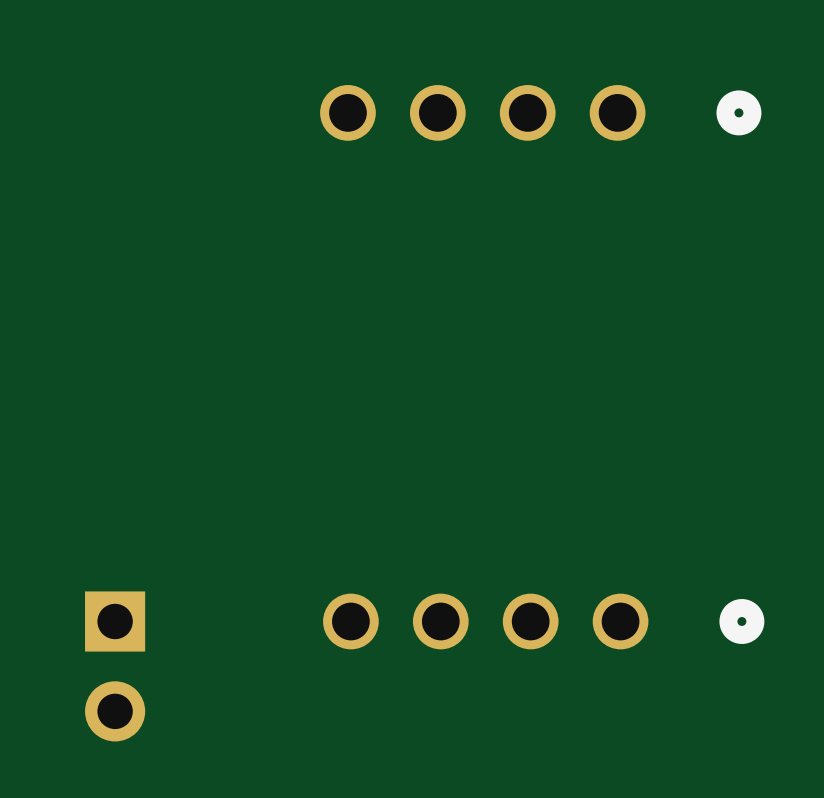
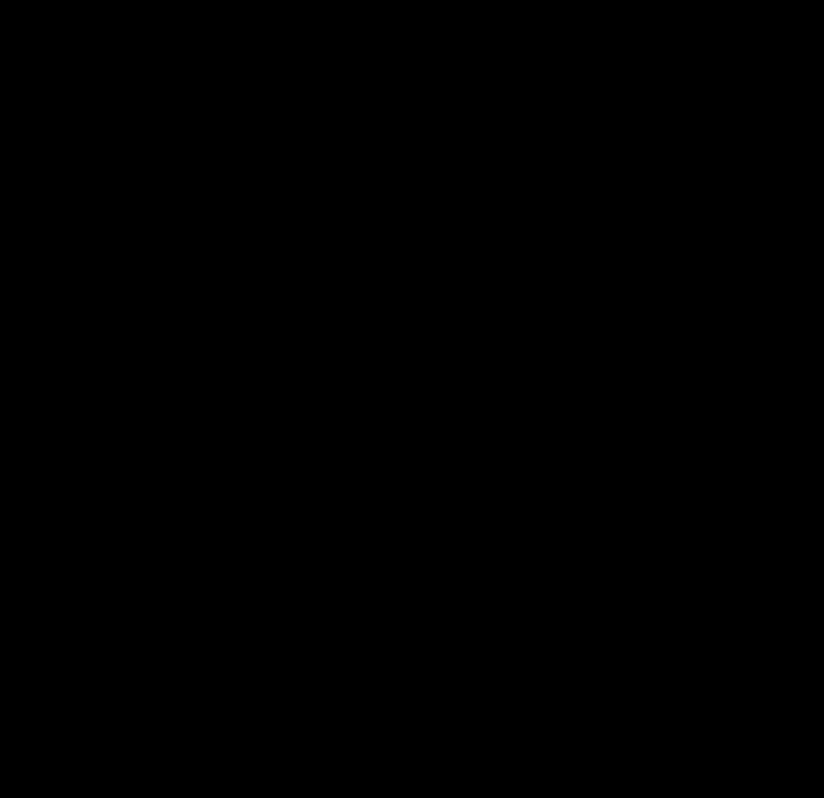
part: (540, 112) -> none
part: (543, 621) -> none
part: (115, 666) -> none

